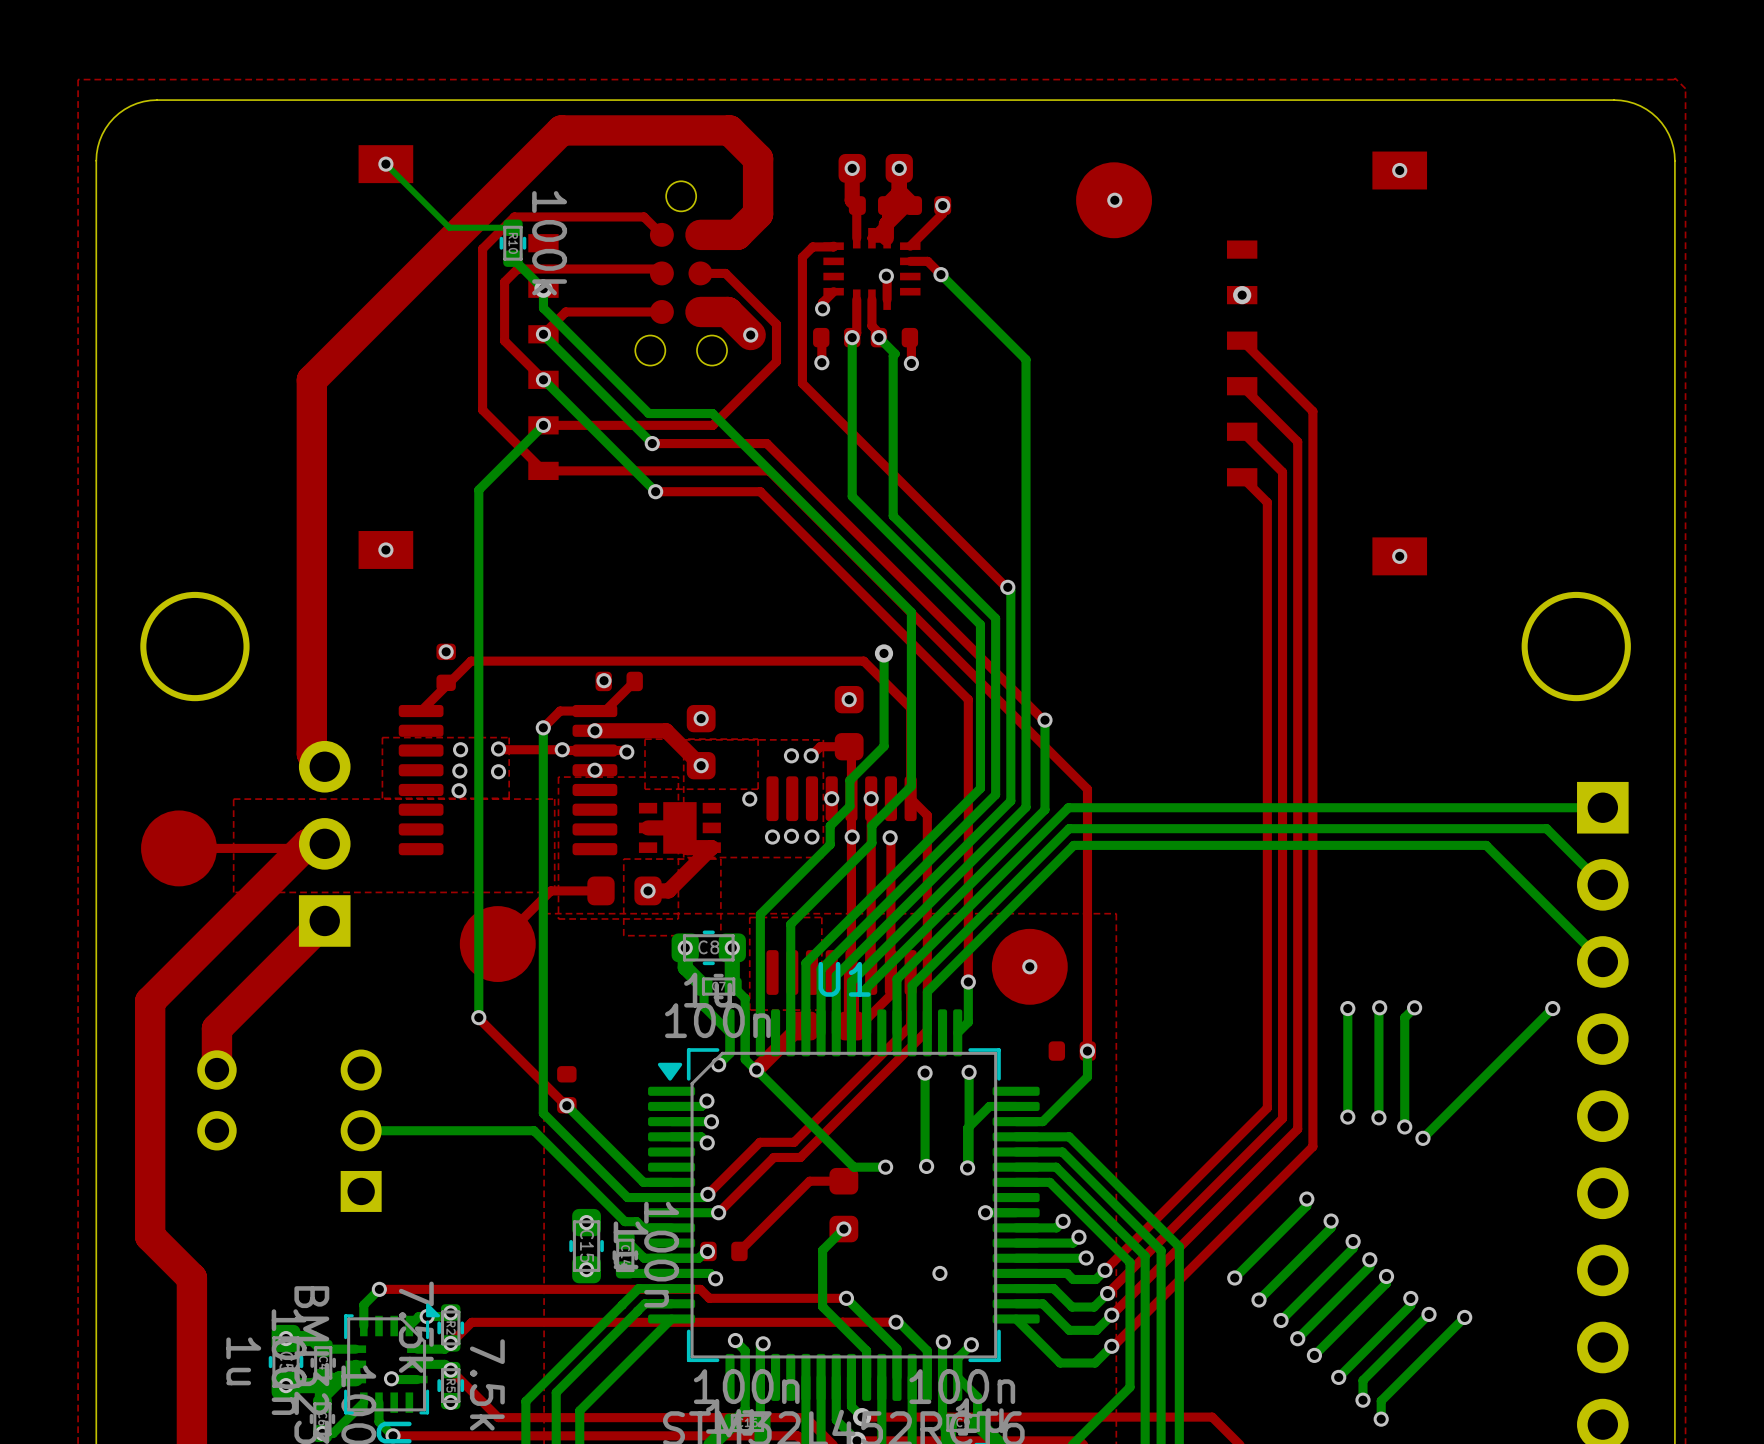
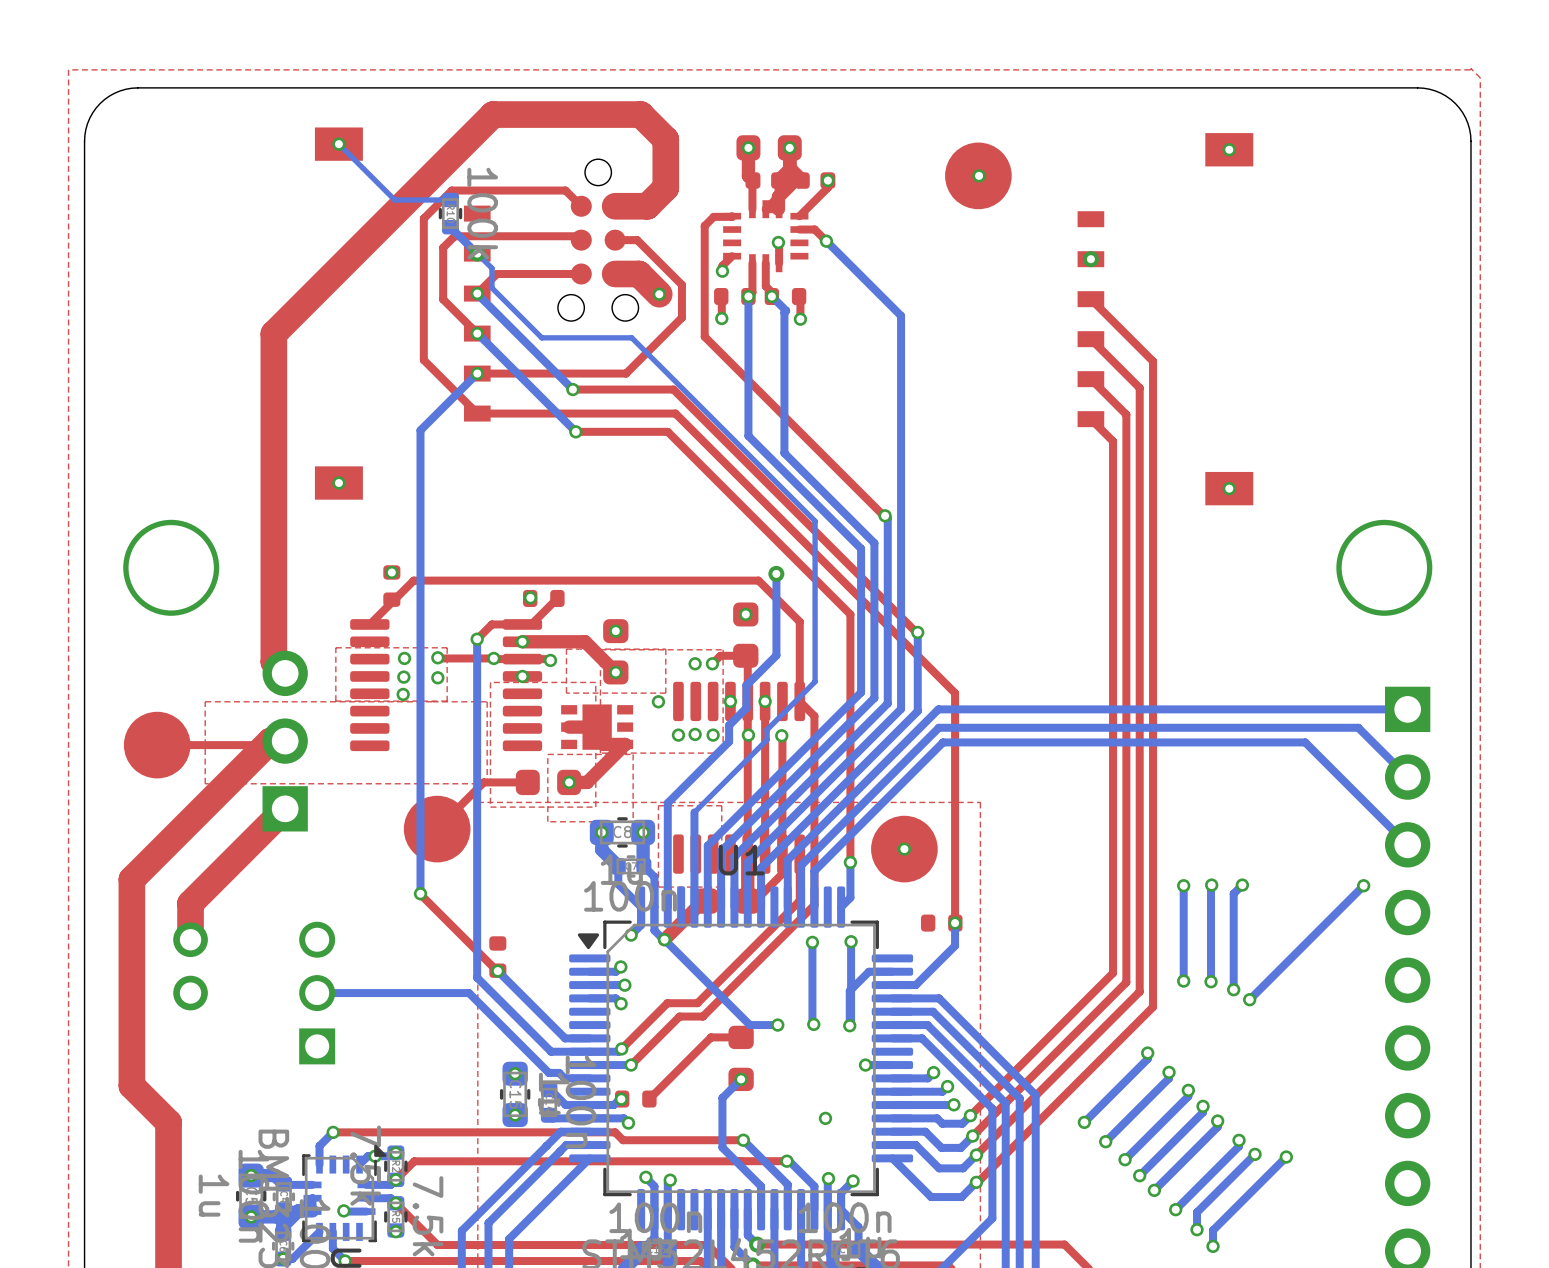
bottom track: (543, 288) (543, 308) (648, 413) (712, 413) (911, 612) (911, 786) (871, 825) (871, 843) (790, 925) -> (450, 227) (491, 268) (491, 287) (541, 337) (631, 337) (815, 521) (815, 681) (767, 729) (767, 739) (694, 812)

